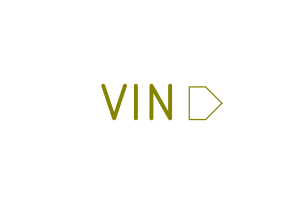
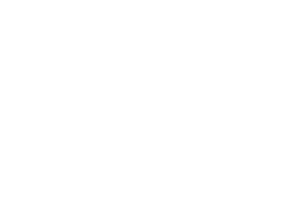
hierarchical label: VIN (136, 102) -> none

